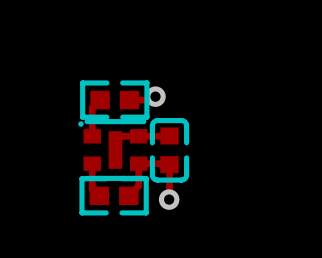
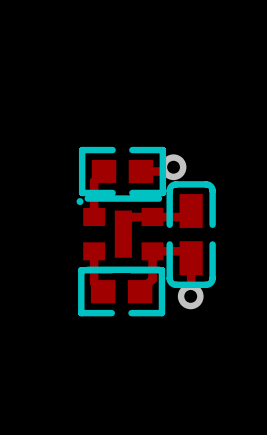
part footprint: [149, 118, 190, 183] -> [166, 181, 216, 289]

